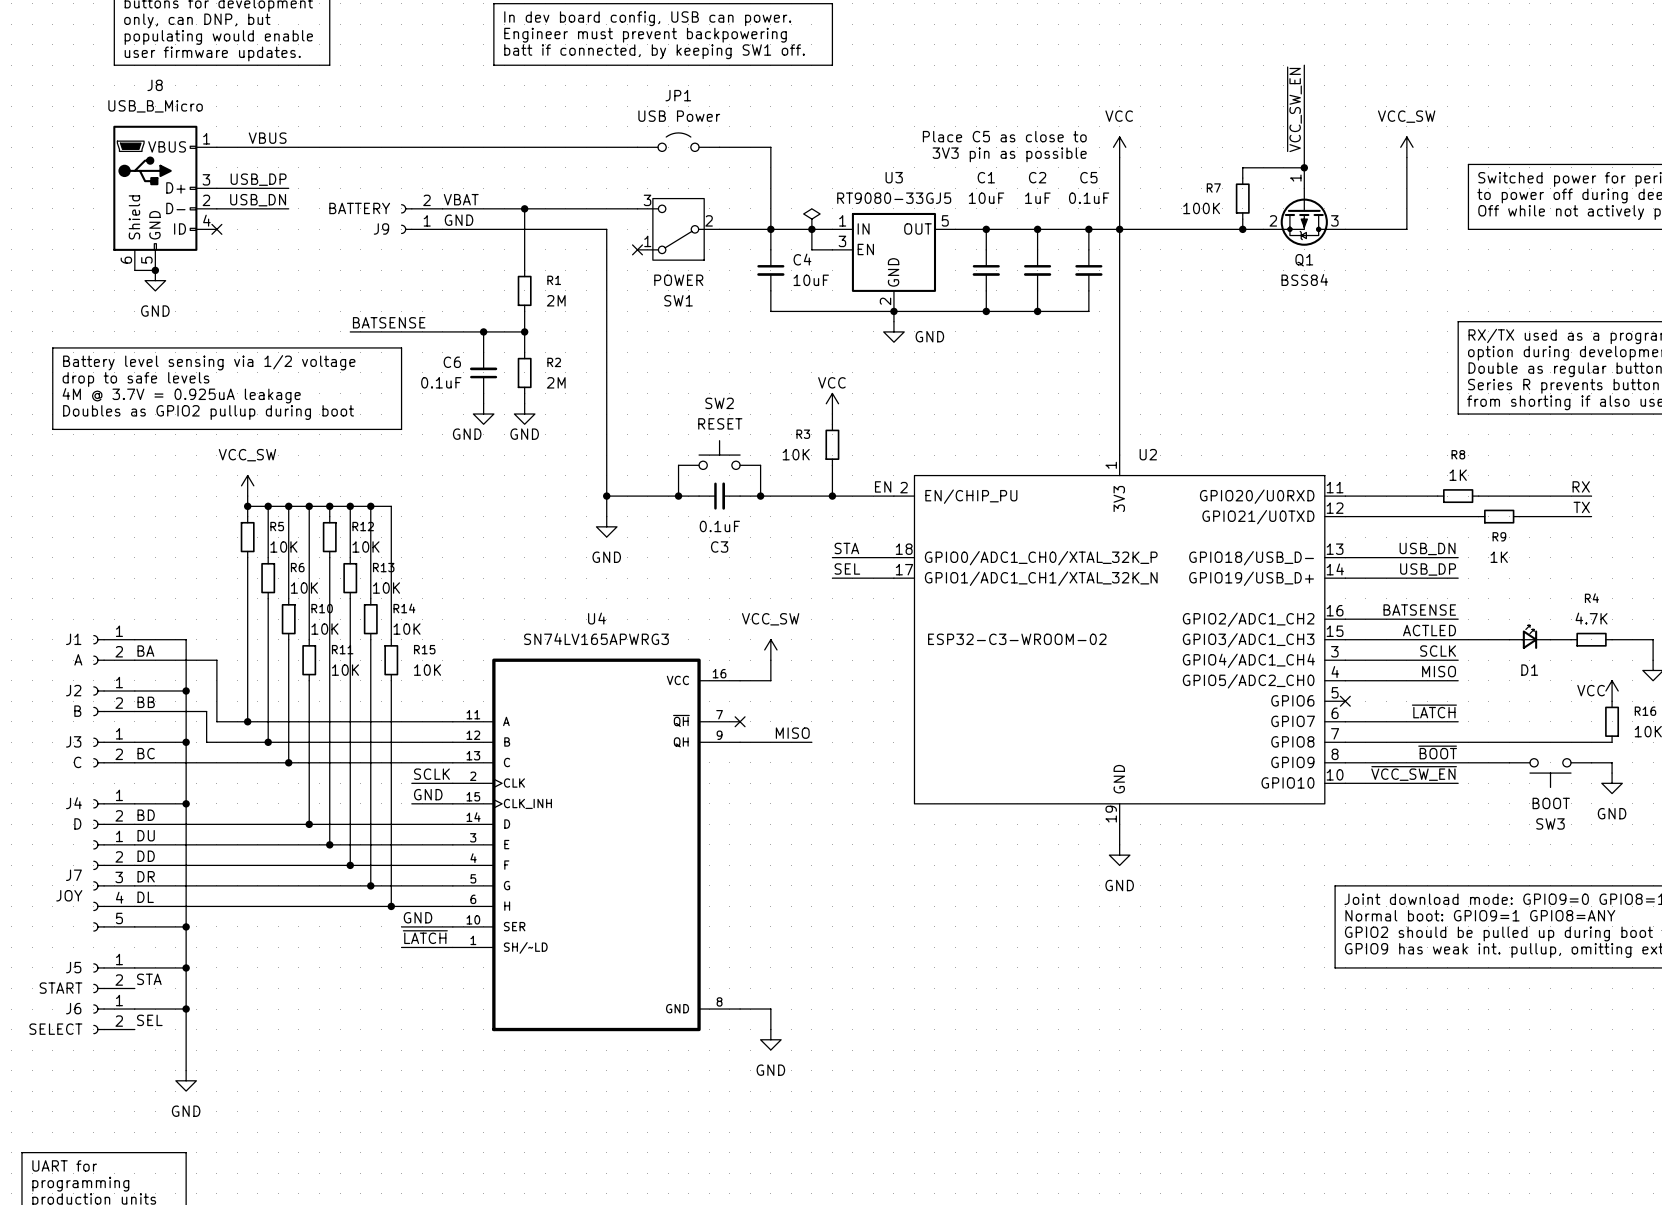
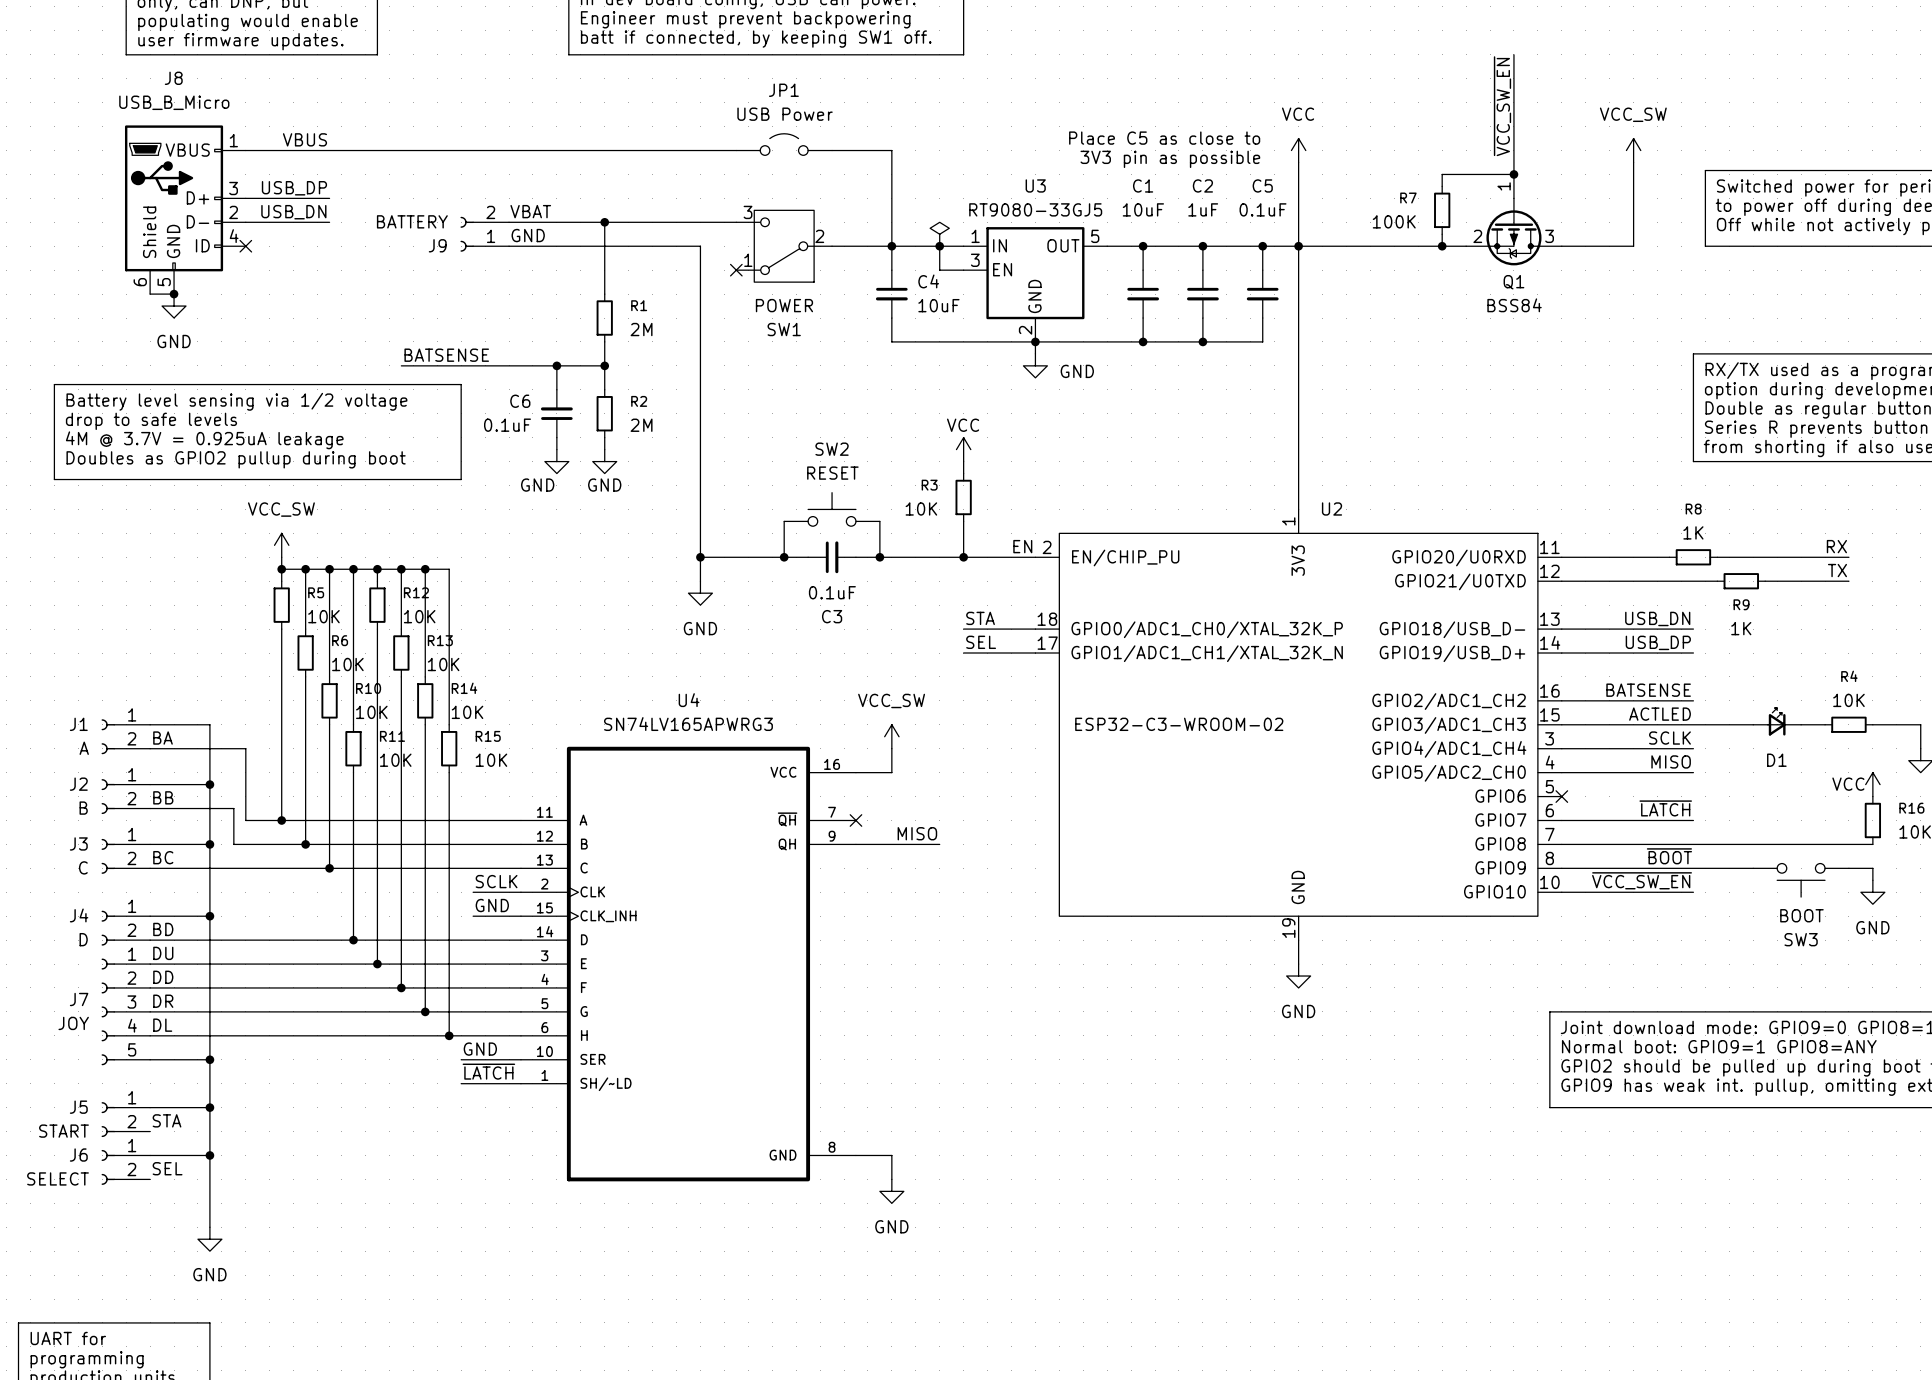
R4 value: 4.7K (1591, 618) -> 10K (1848, 700)

